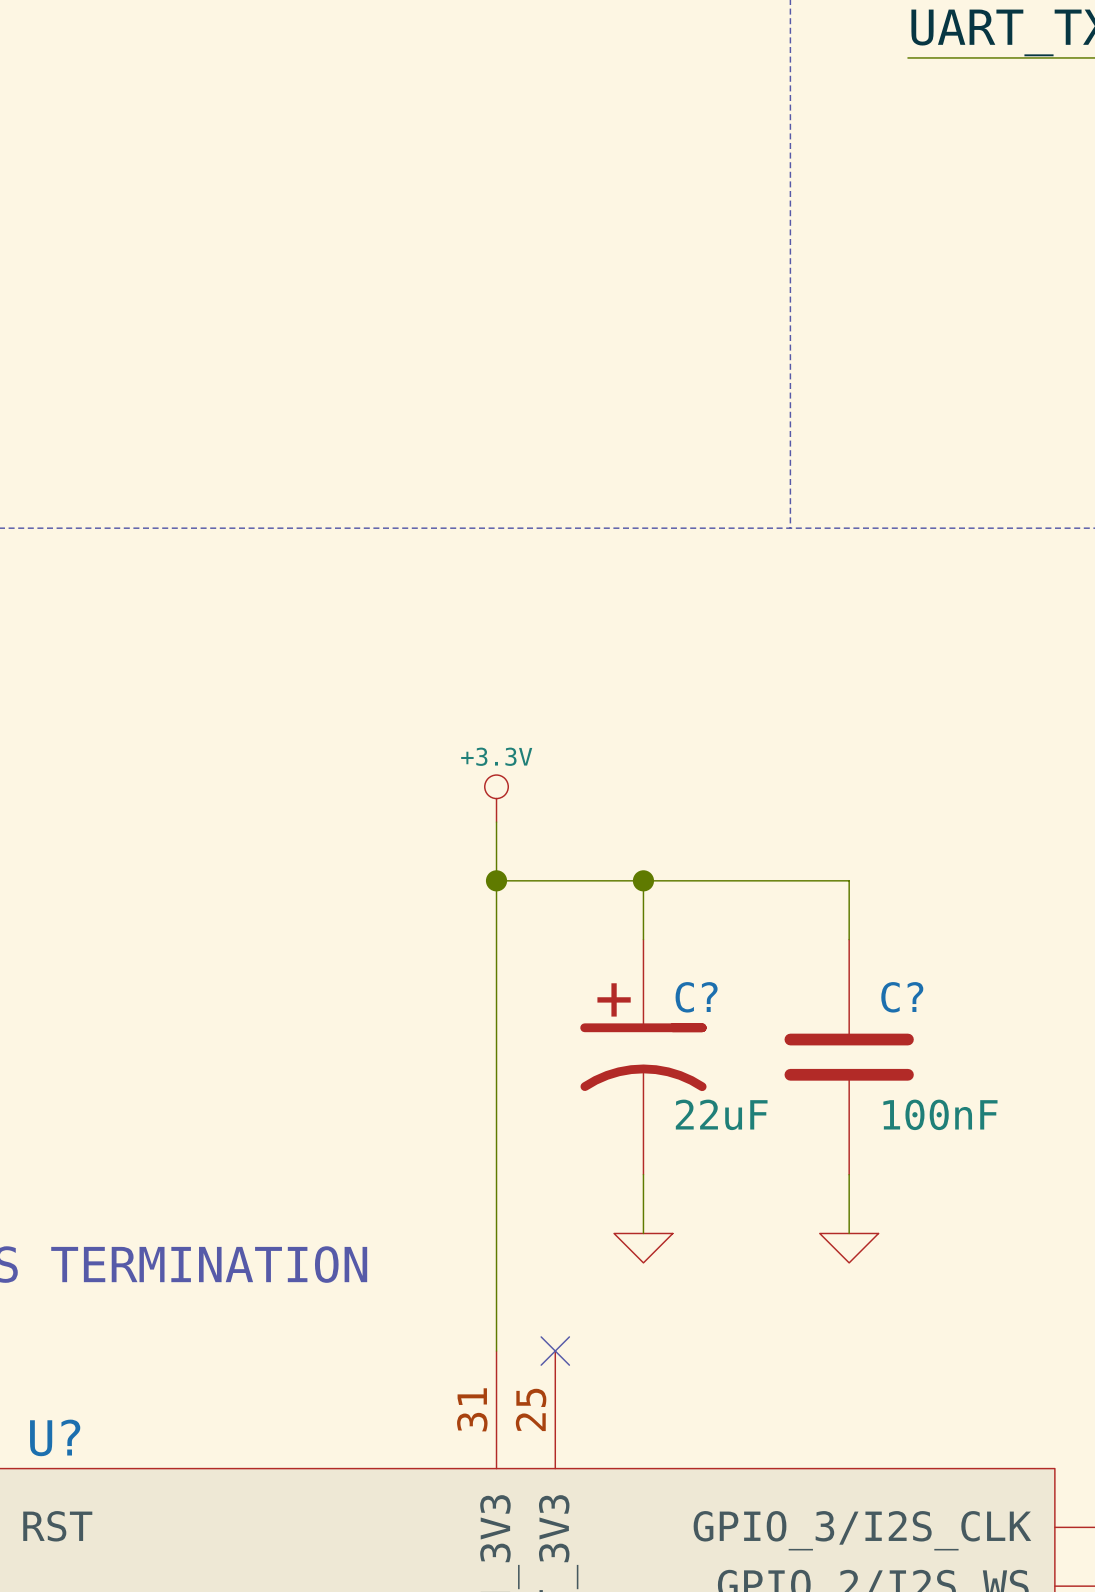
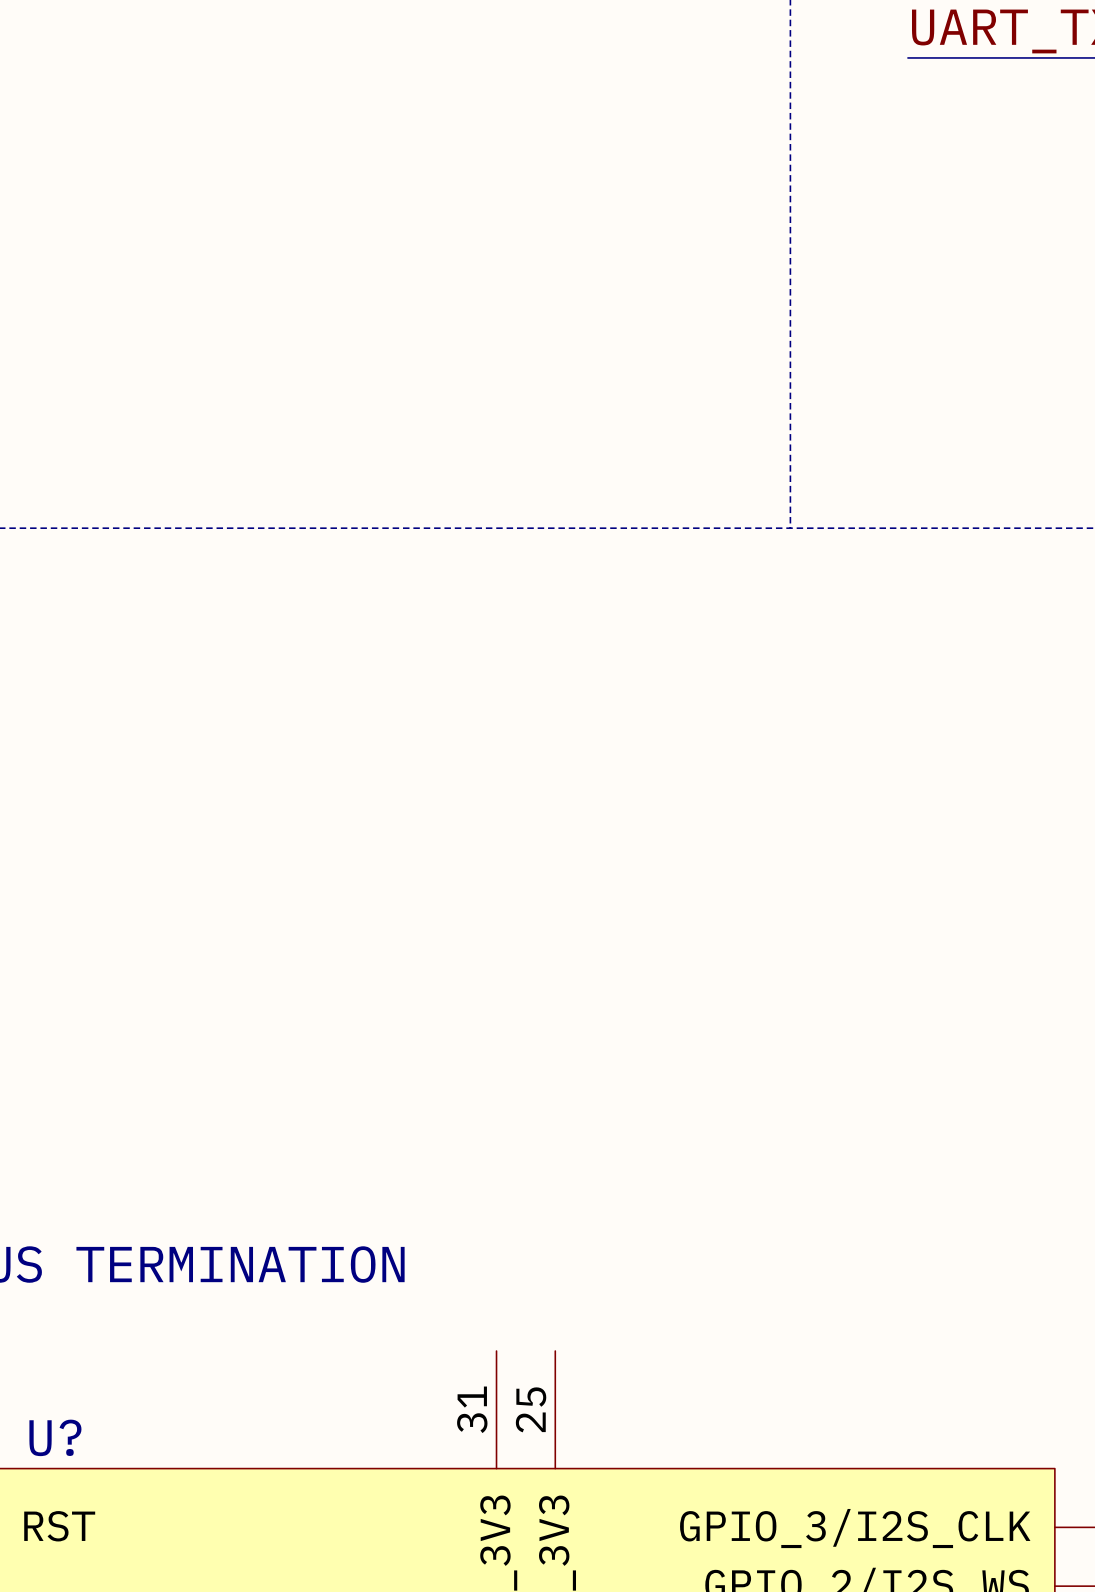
power symbol: +3.3V (496, 798) -> none
wire: (496, 822) (496, 1351) -> none
wire: (496, 880) (849, 880) (849, 939) -> none
junction: (496, 880) -> none
wire: (643, 880) (643, 939) -> none
junction: (643, 880) -> none
C?: 22uF (643, 1057) -> none
C?: 100nF (849, 1057) -> none
wire: (643, 1174) (643, 1233) -> none
wire: (849, 1174) (849, 1233) -> none
power symbol: (643, 1248) -> none
power symbol: (849, 1248) -> none
no-connect mark: (555, 1351) -> none

